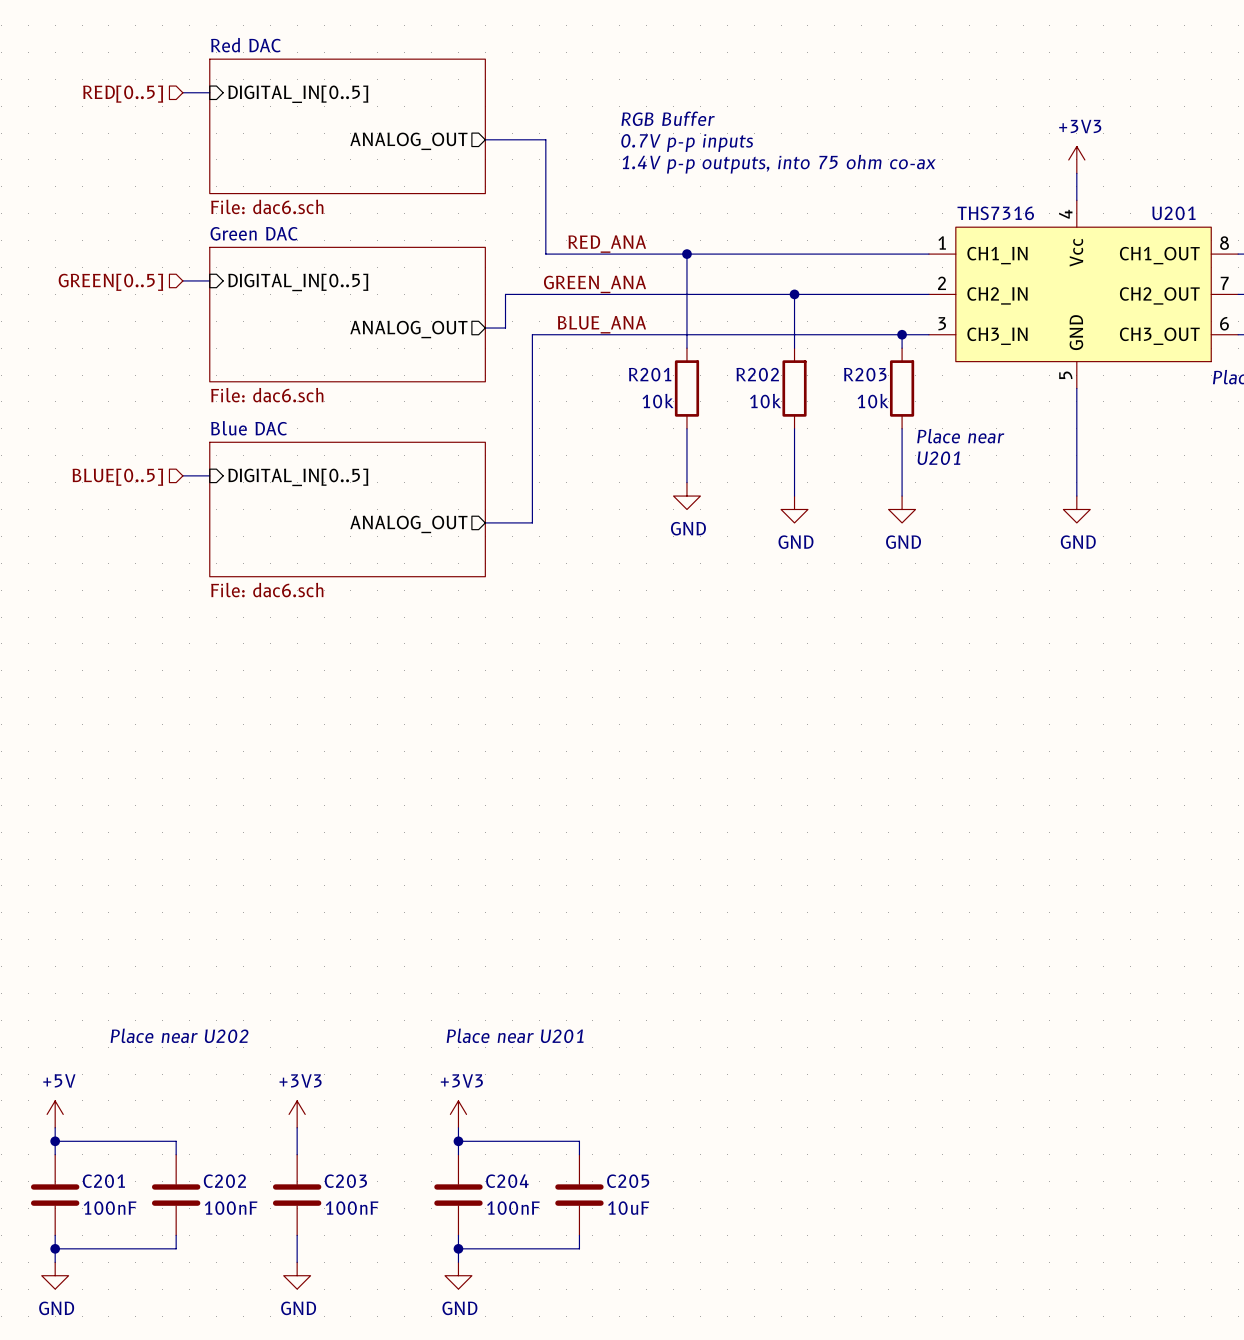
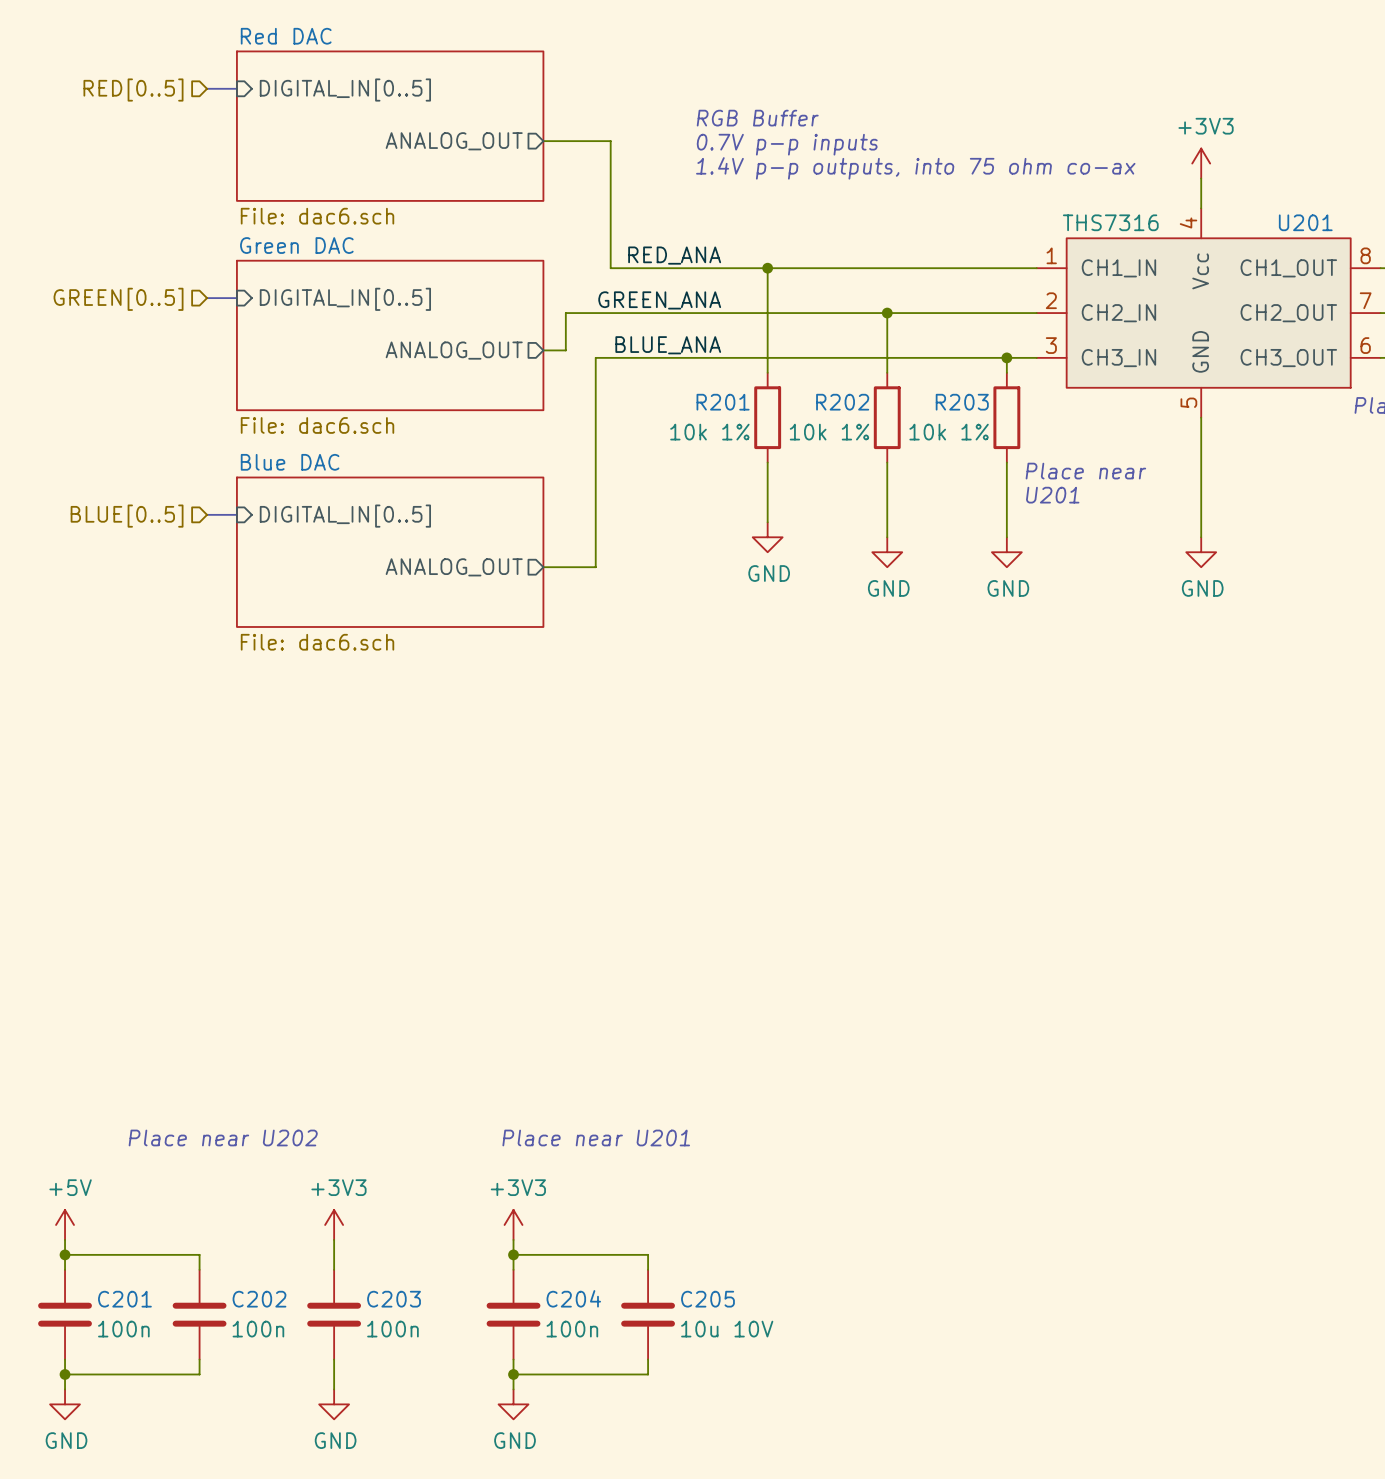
R201 value: 10k (658, 401) -> 10k 1% (709, 432)
R202 value: 10k (765, 401) -> 10k 1% (829, 432)
R203 value: 10k (873, 401) -> 10k 1% (949, 432)
C201 value: 100nF (110, 1208) -> 100n (123, 1329)
C202 value: 100nF (231, 1208) -> 100n (258, 1329)
C203 value: 100nF (352, 1208) -> 100n (392, 1329)
C204 value: 100nF (513, 1208) -> 100n (572, 1329)
C205 value: 10uF (628, 1208) -> 10u 10V (727, 1329)

